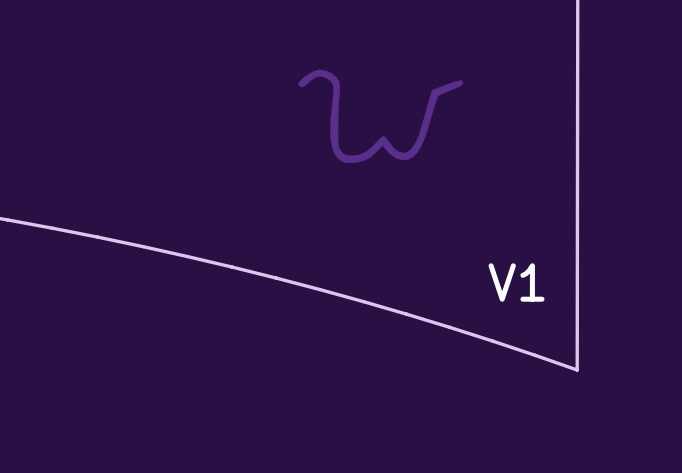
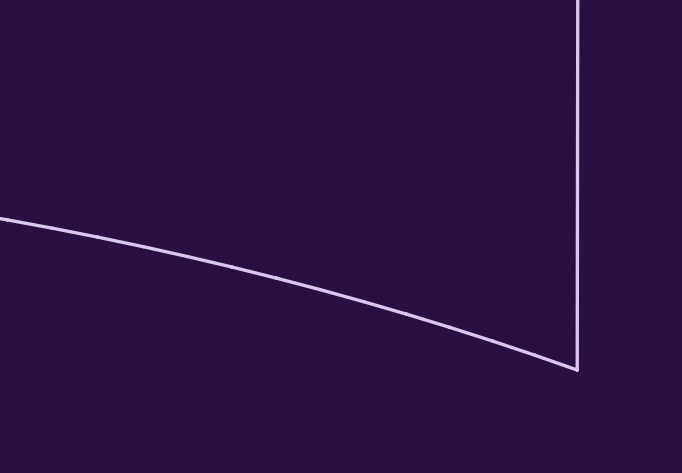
drawing: [298, 69, 464, 164] -> none
text: V1 (516, 282) -> none

